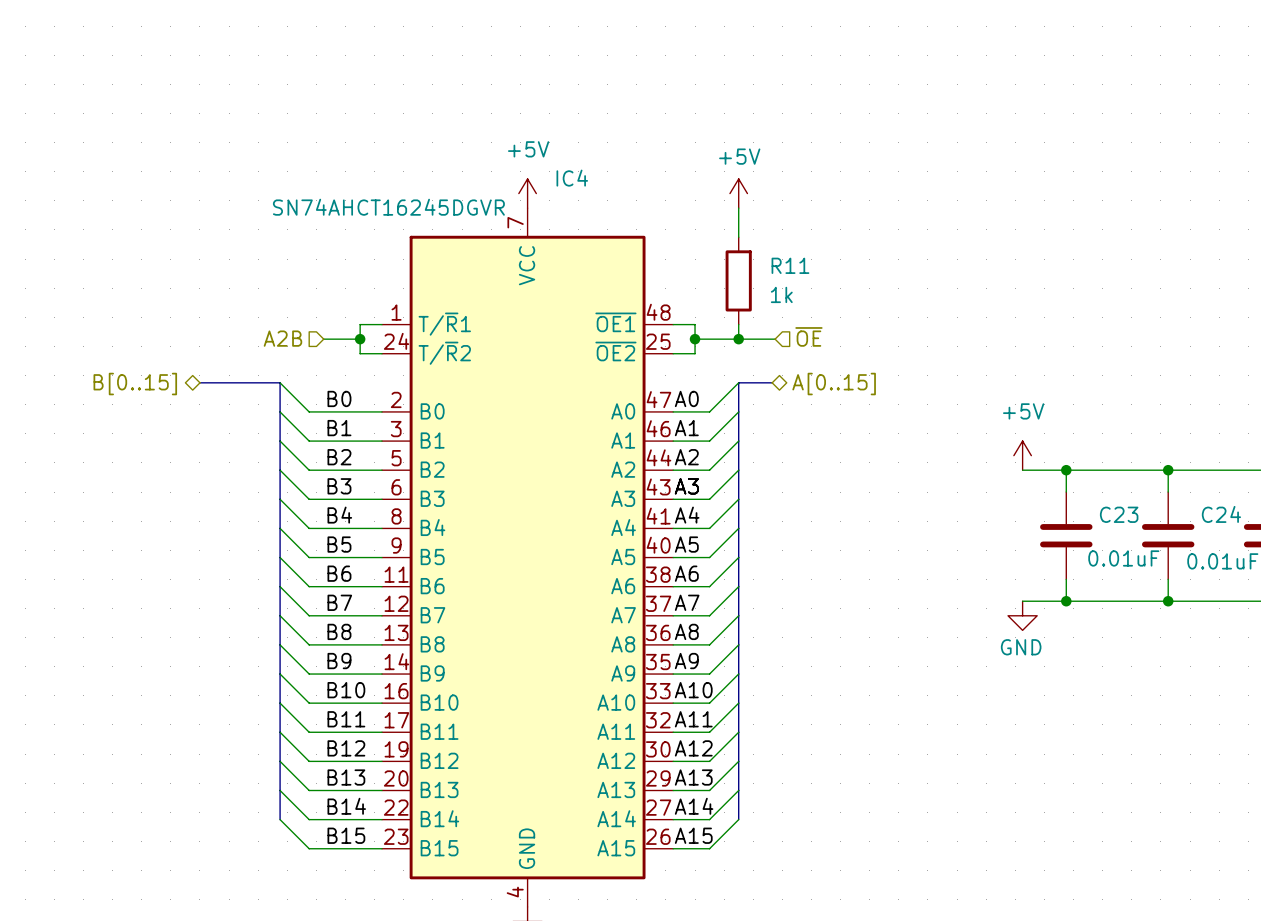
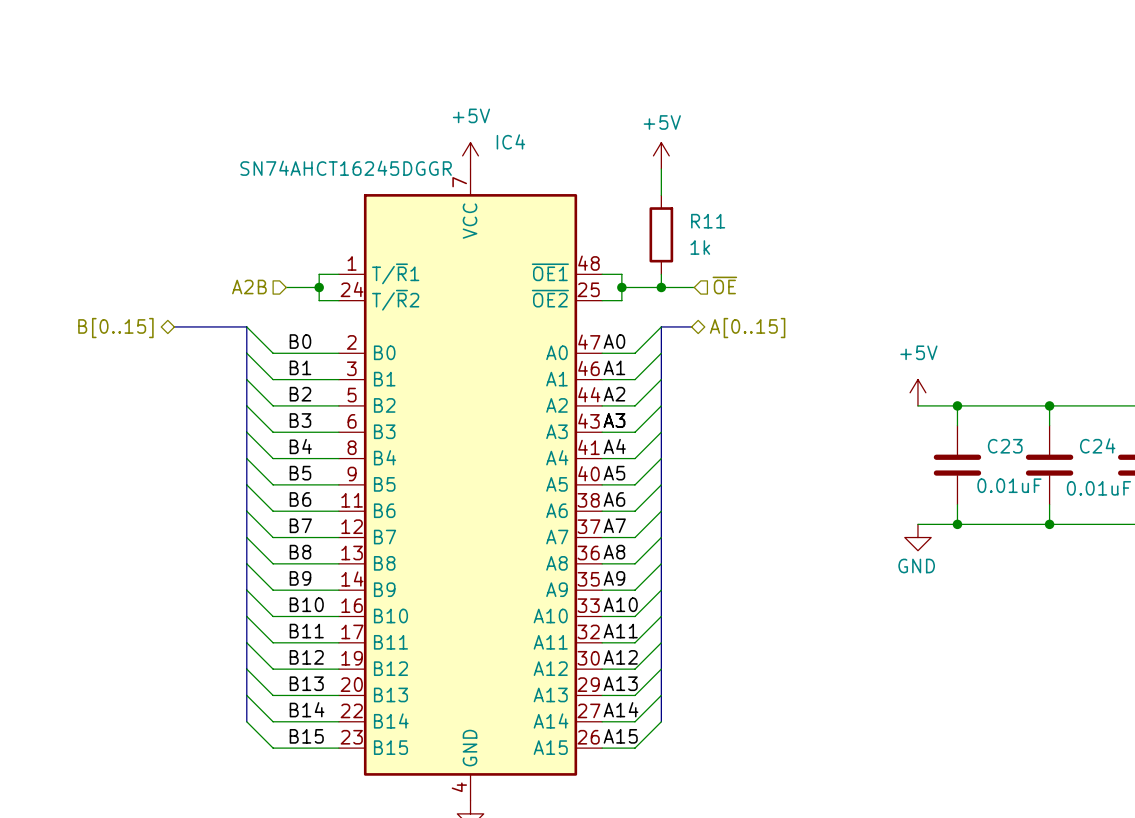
IC4 value: SN74AHCT16245DGVR (388, 207) -> SN74AHCT16245DGGR (346, 168)

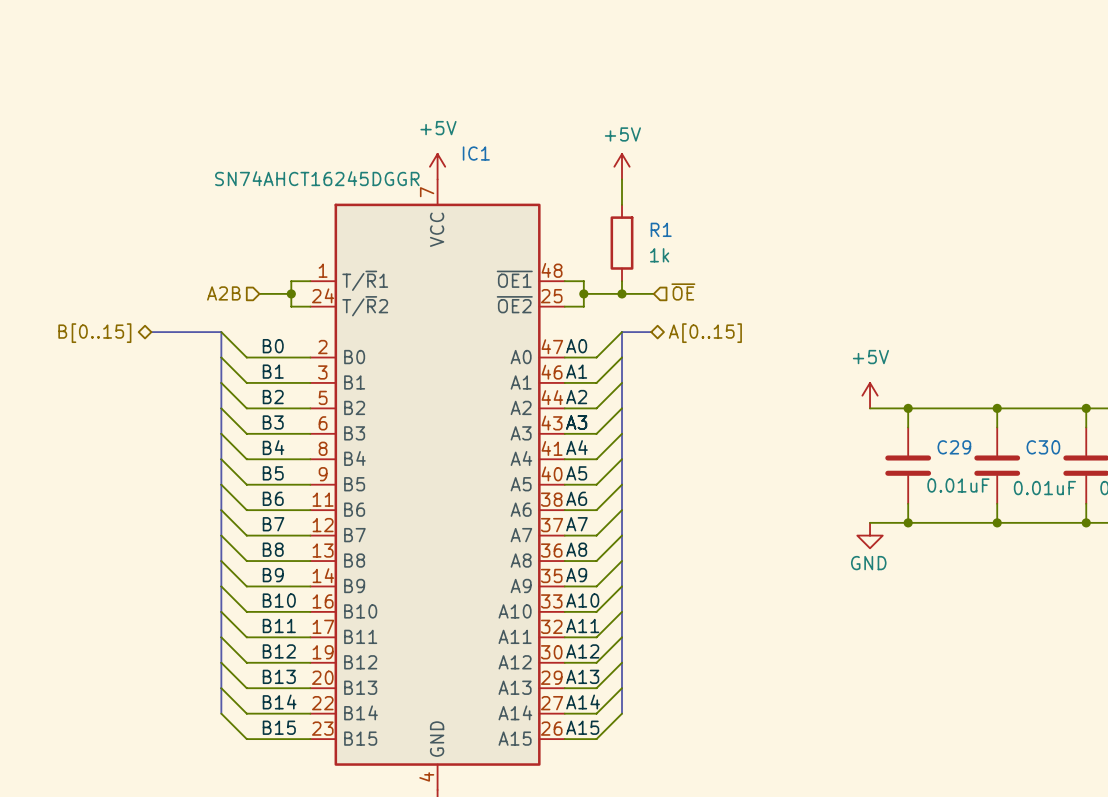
IC4 name: IC4 (510, 141) -> IC1 (476, 153)
R11 name: R11 (708, 221) -> R1 (661, 229)
C24 name: C24 (1097, 445) -> C30 (1043, 447)
C23 name: C23 (1005, 446) -> C29 (954, 447)

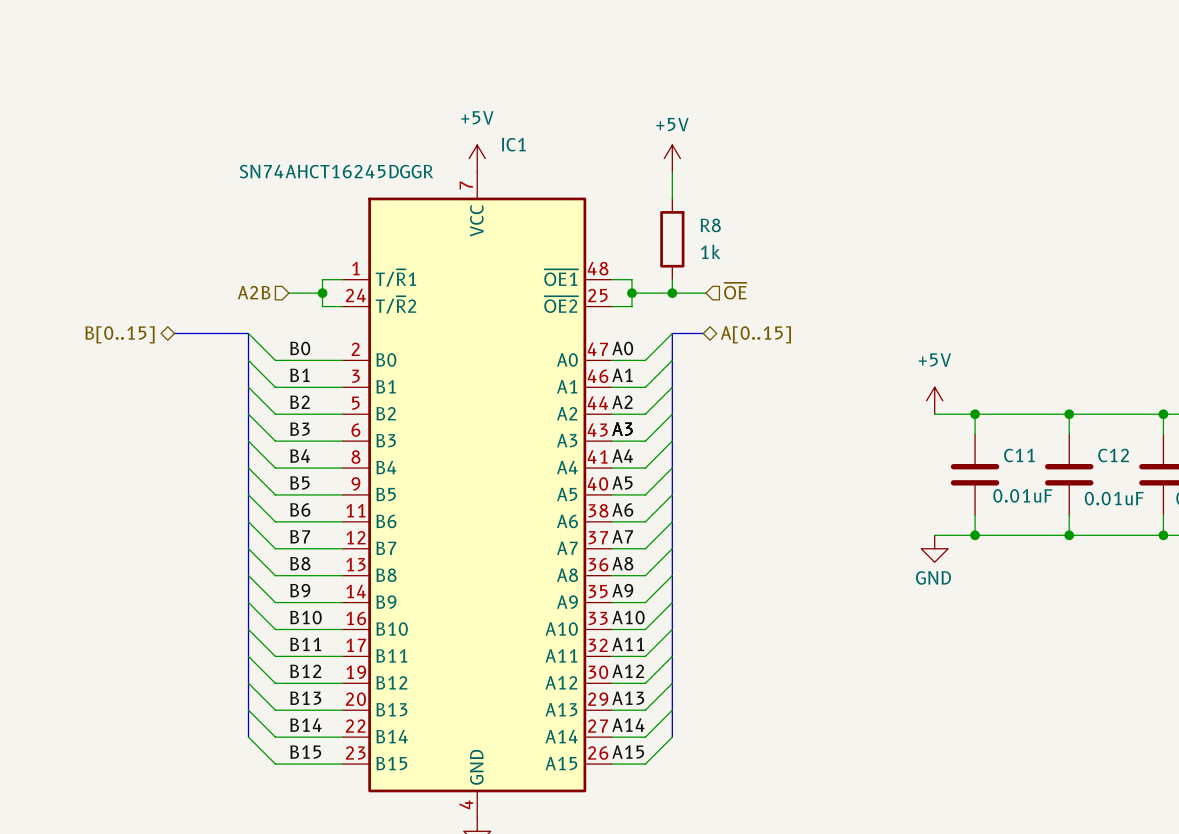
R1 name: R1 (661, 229) -> R8 (710, 225)
C29 name: C29 (954, 447) -> C11 (1019, 455)
C30 name: C30 (1043, 447) -> C12 (1113, 455)

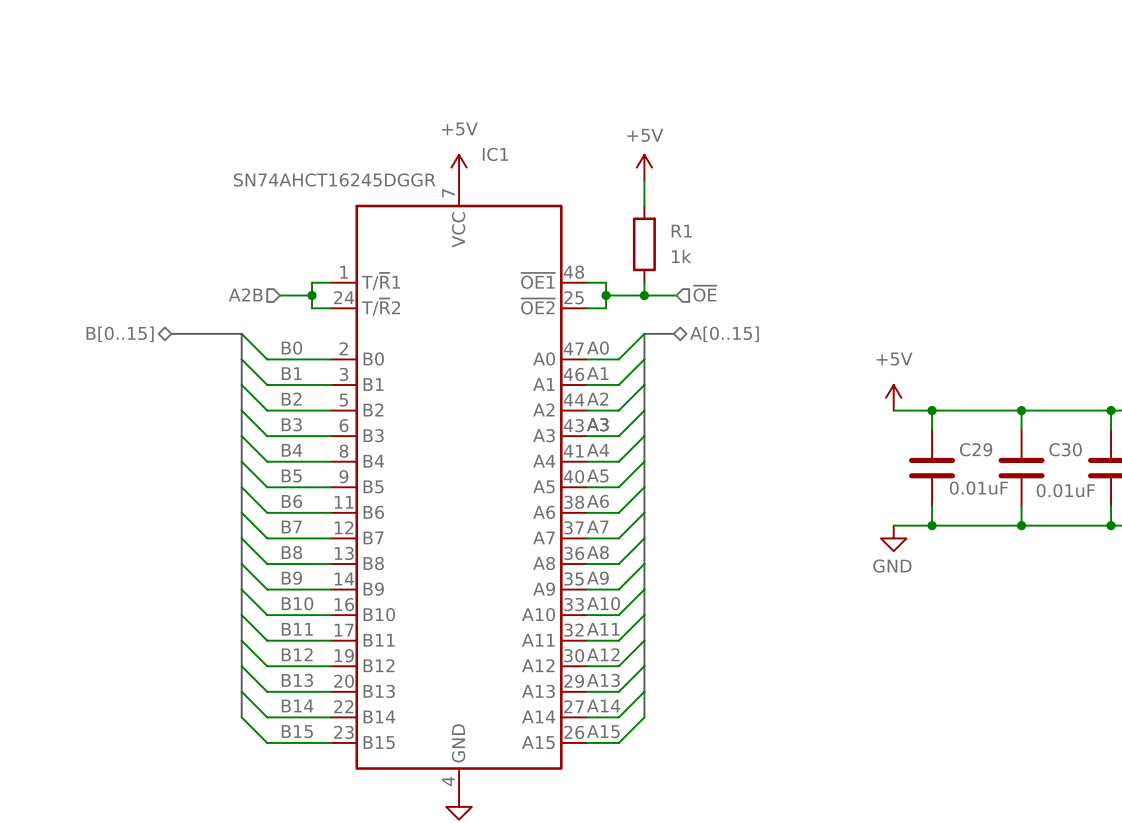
R8 name: R8 (710, 225) -> R1 (681, 231)
C11 name: C11 (1019, 455) -> C29 (976, 449)
C12 name: C12 (1113, 455) -> C30 (1065, 449)

